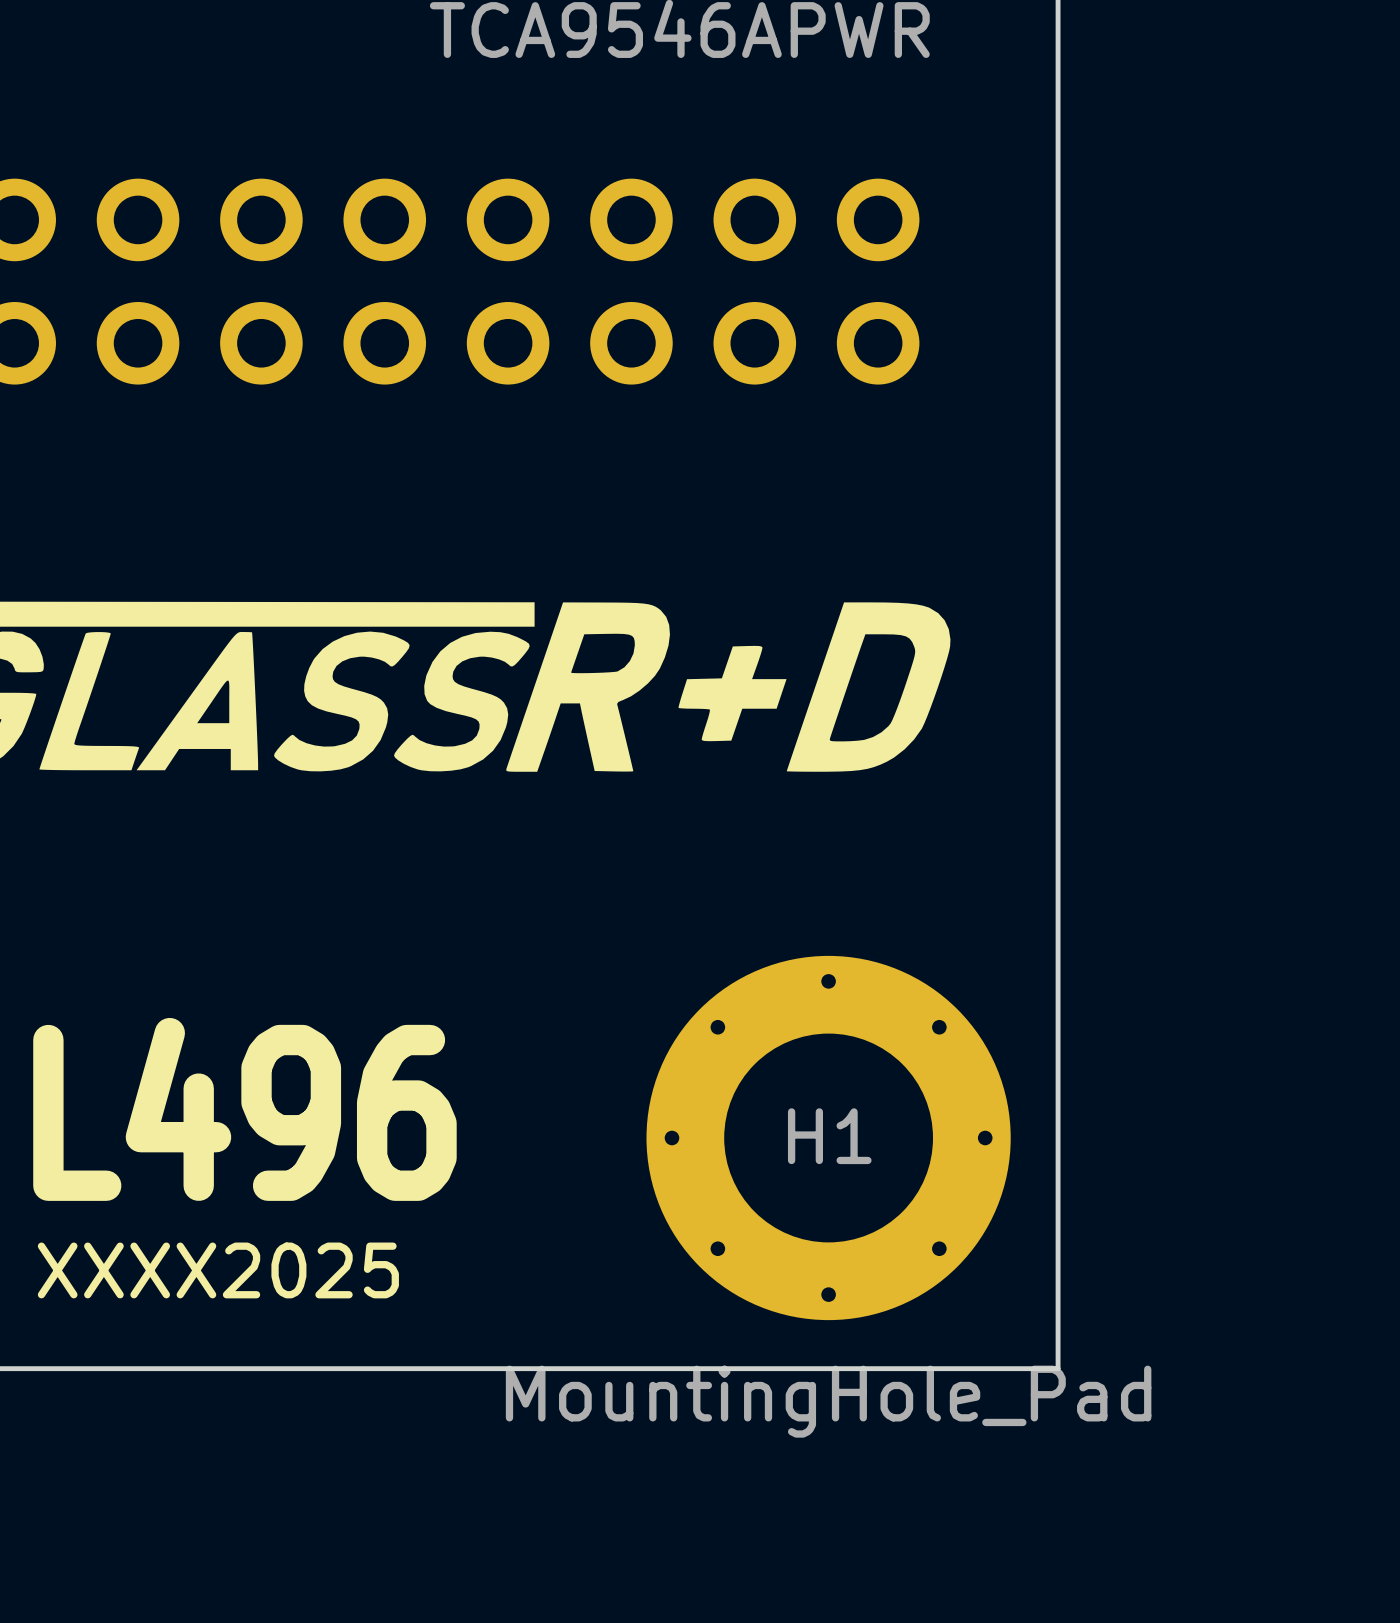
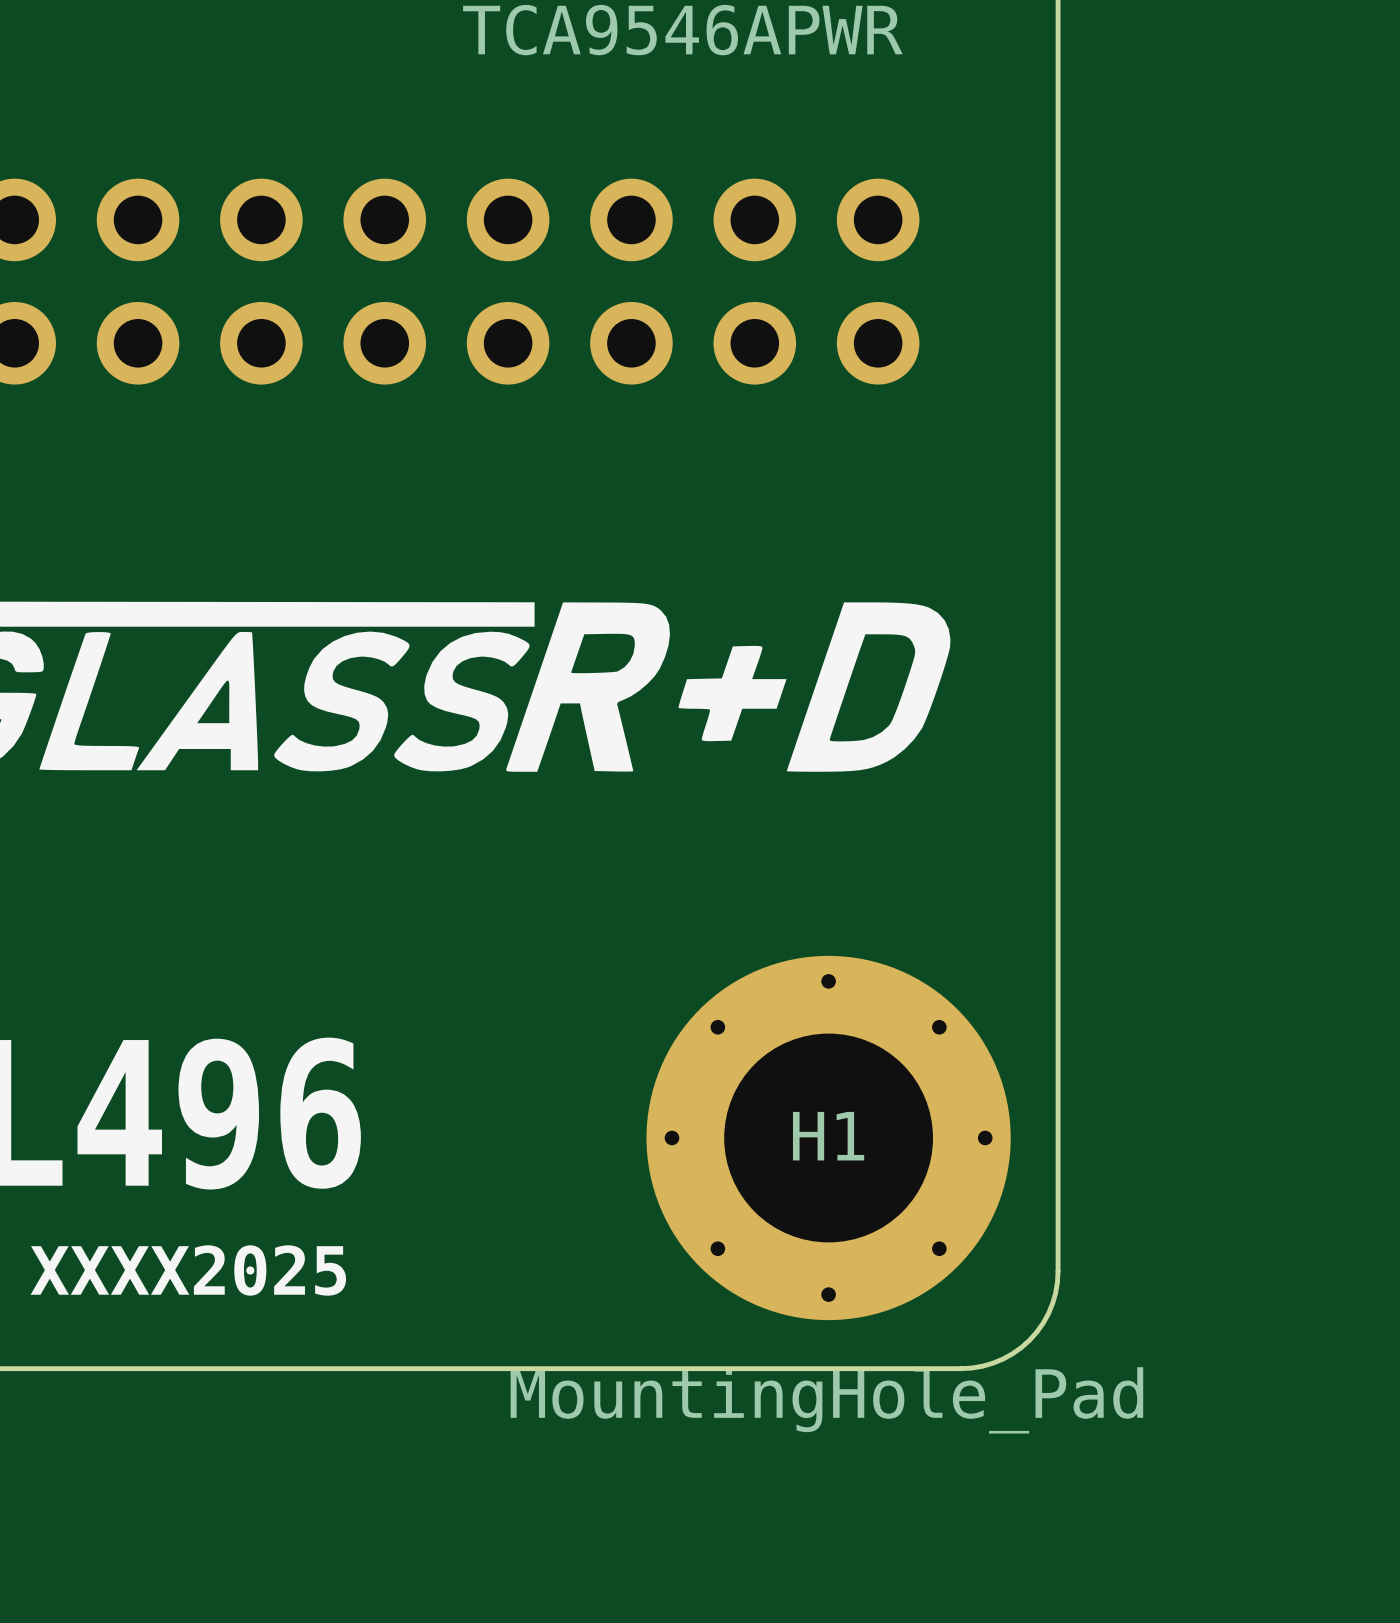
board edge: (1058, 1271) (1058, 1368) (960, 1368) -> (1058, 1271) (1055, 1293) (1048, 1313) (1029, 1340) (1003, 1359) (982, 1366) (960, 1368)

